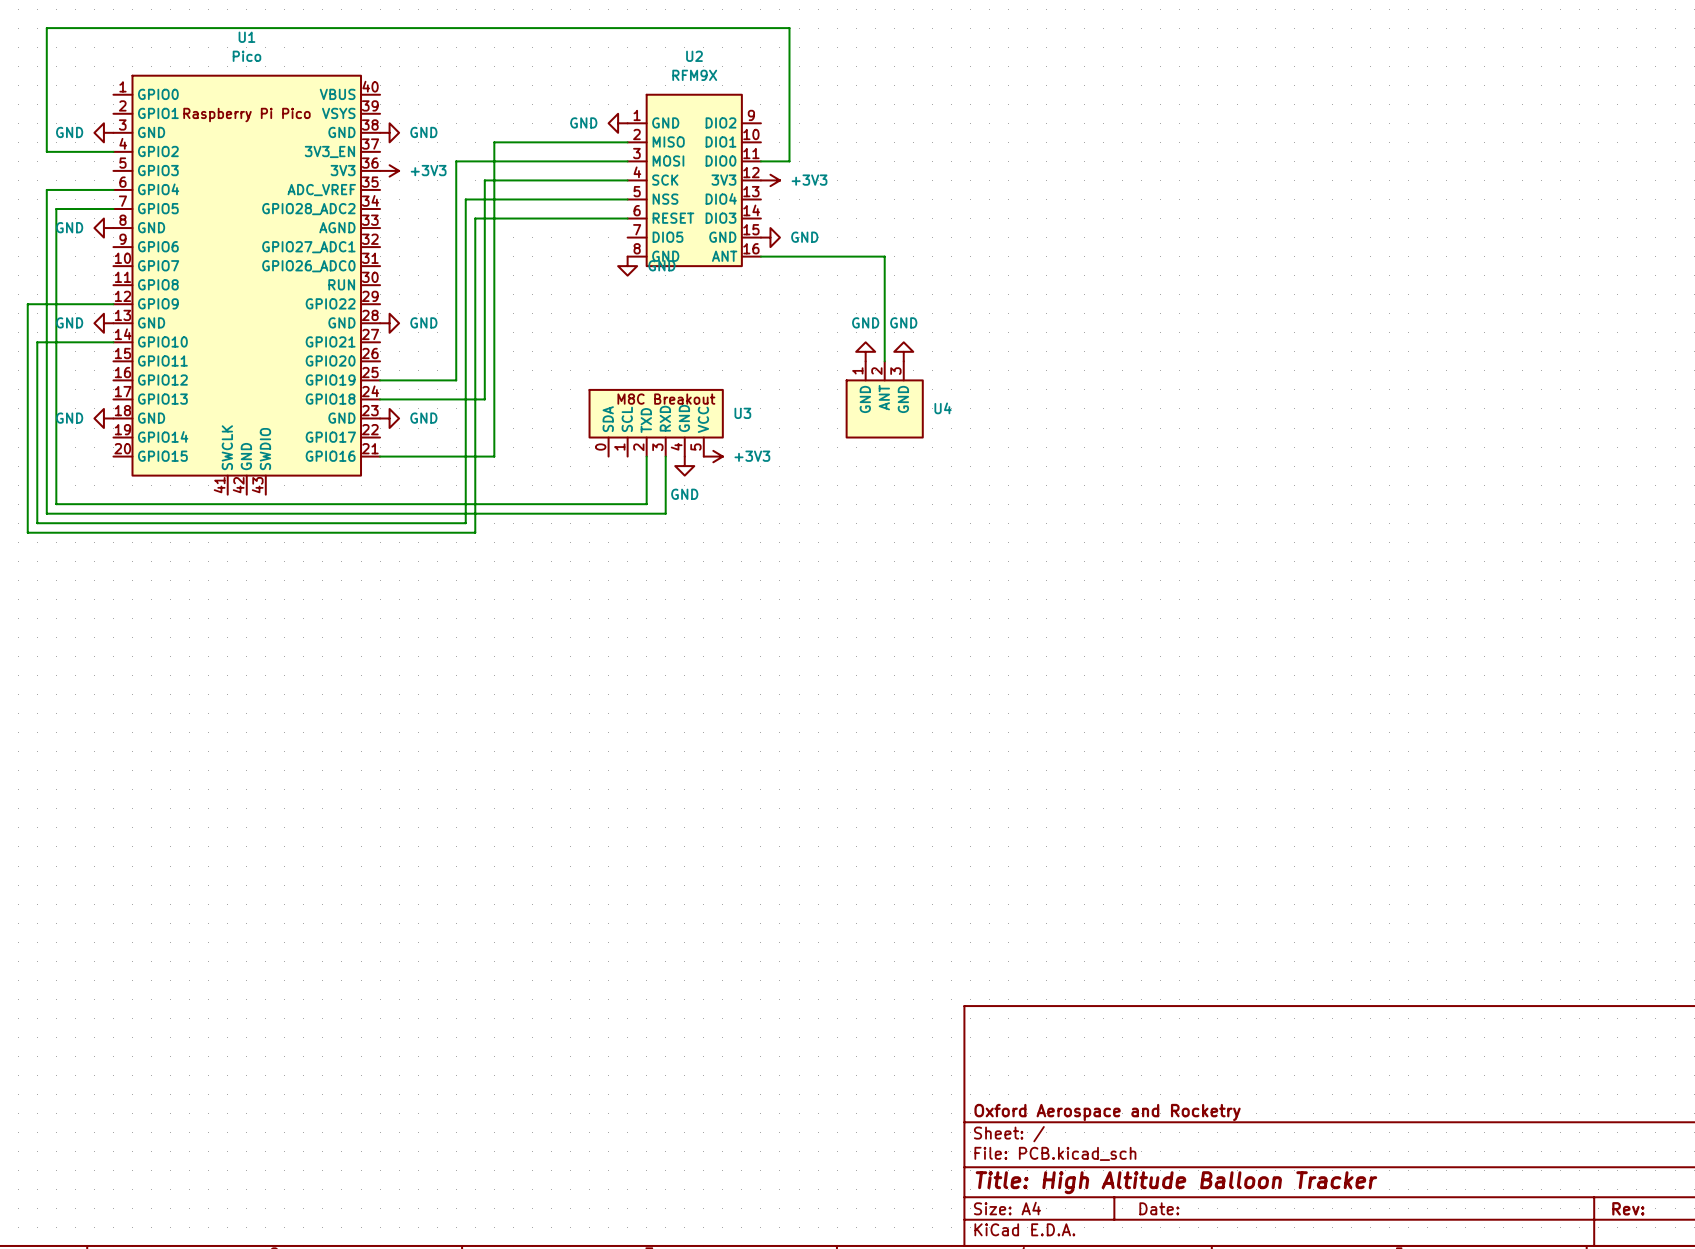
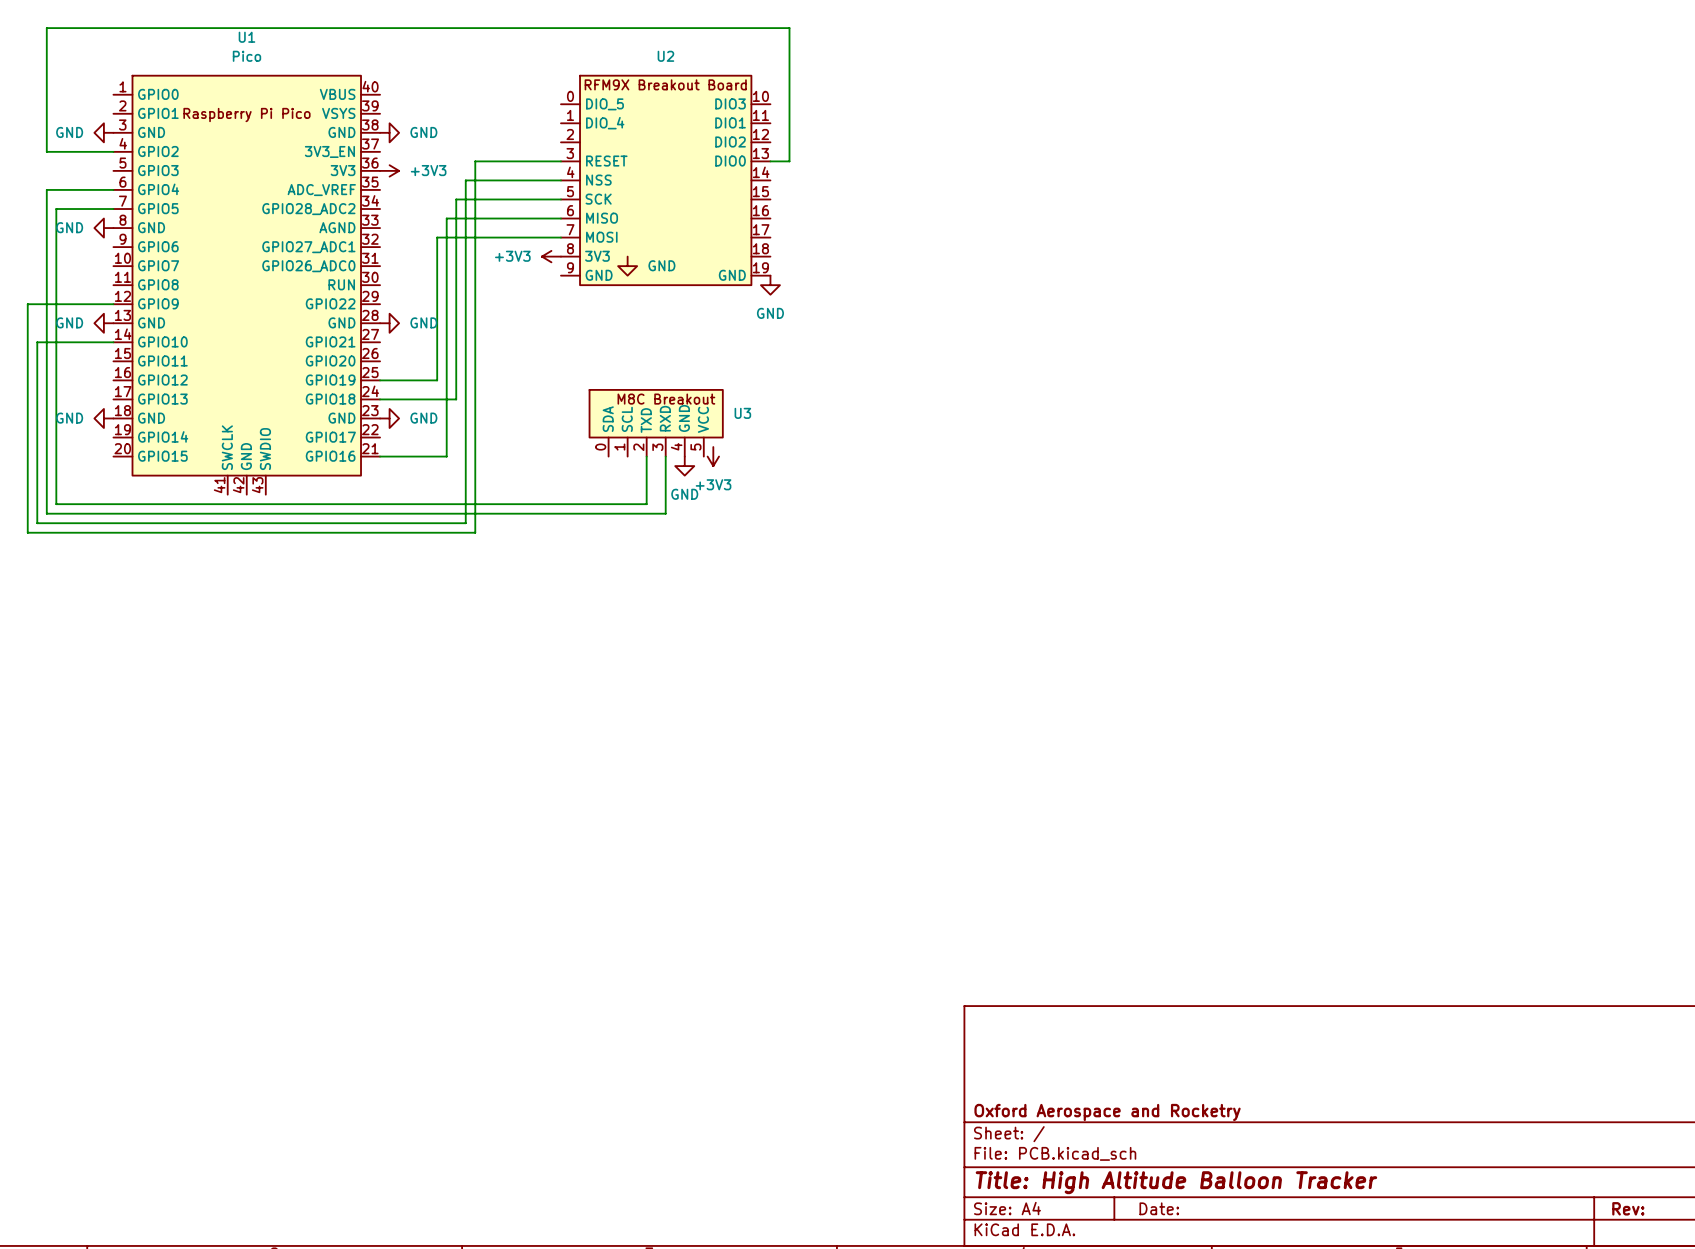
U2 value: RFM9X (694, 75) -> none
U2 symbol: [627, 94, 761, 267] -> [560, 75, 771, 286]
power symbol: GND (618, 123) -> none
wire: (627, 142) (494, 142) (494, 456) (446, 456) -> (475, 161) (475, 218) (446, 218) (446, 456)
wire: (475, 161) (456, 161) (456, 199) -> (484, 180) (465, 180) (465, 199) (456, 199)
wire: (484, 180) (484, 399) (456, 399) -> none
power symbol: +3V3 (770, 180) -> none
wire: none -> (560, 237) (437, 237) (437, 380)
power symbol rotation: 0° (770, 237) -> 90° clockwise (770, 285)
power symbol position: GND (770, 237) -> GND (770, 285)
power symbol: none -> +3V3 (551, 256)
wire: (760, 256) (884, 256) (884, 361) -> none
power symbol: GND (865, 351) -> none
power symbol: GND (903, 351) -> none
wire: (437, 380) (456, 380) -> (456, 399) (456, 380)
U4: (884, 399) -> none
power symbol rotation: 0° (713, 456) -> 90° clockwise (713, 456)

